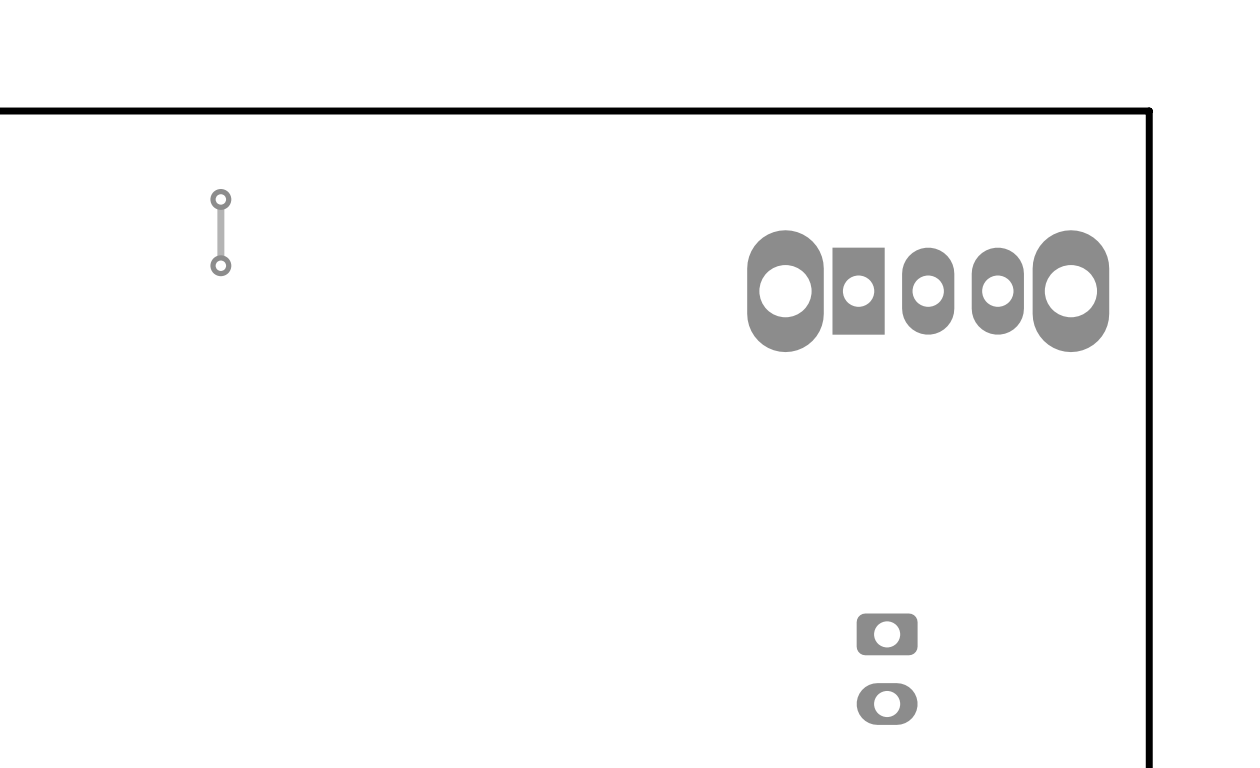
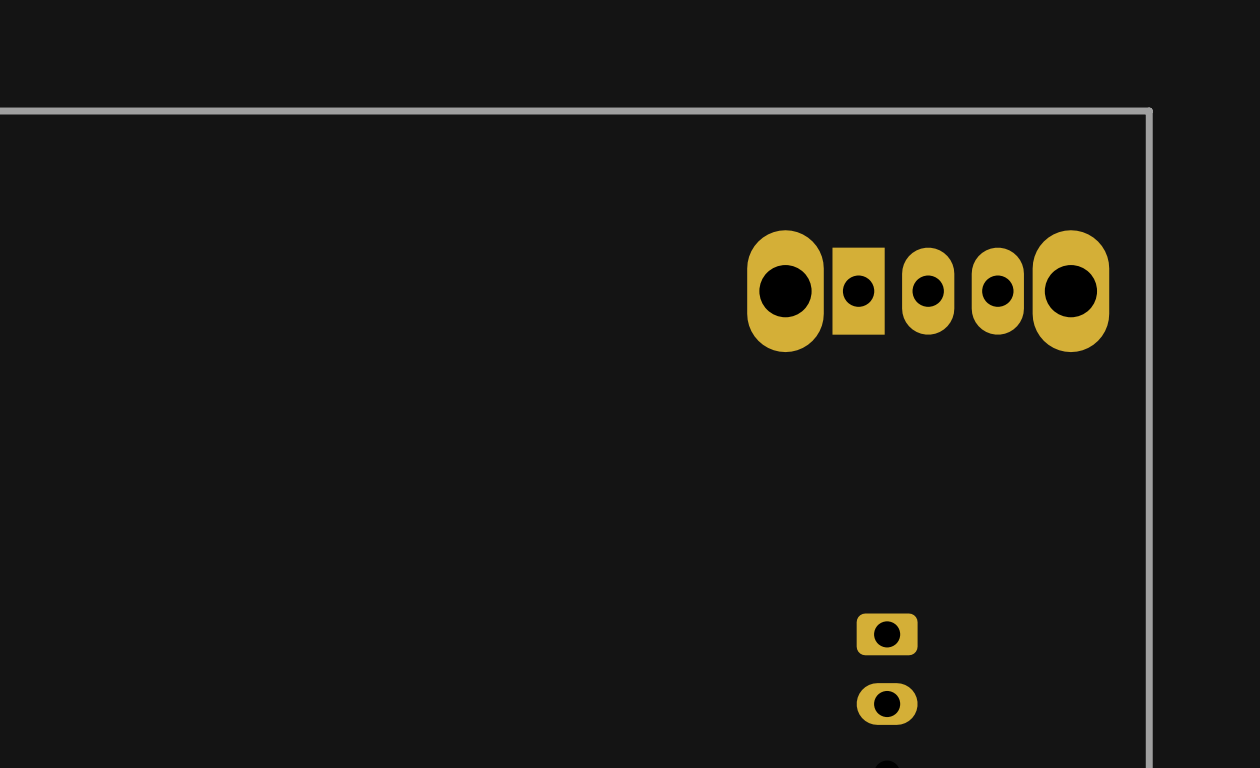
track: (220, 199) (220, 265) -> none
via: (220, 199) -> none
via: (220, 265) -> none

